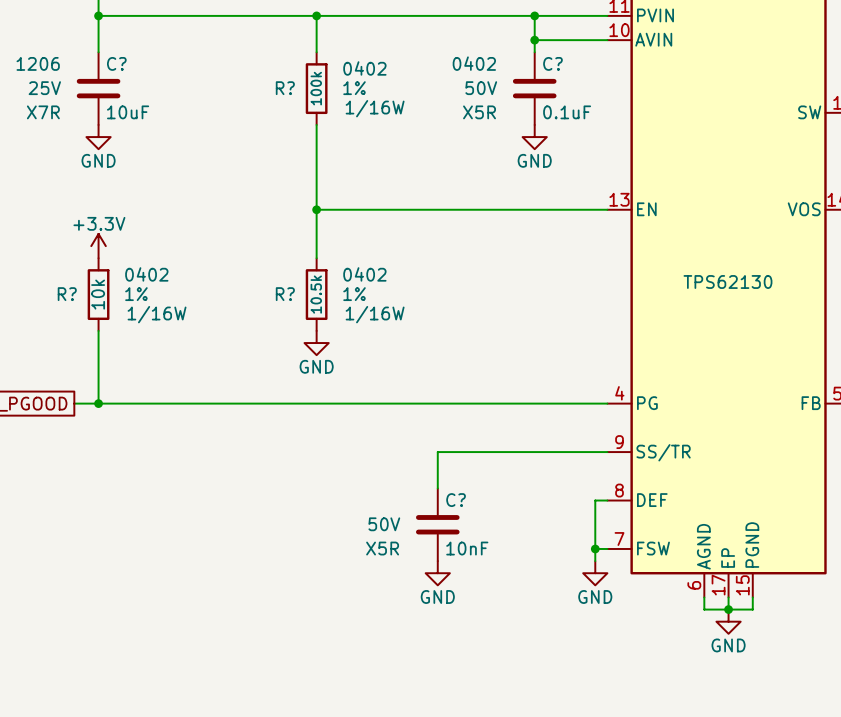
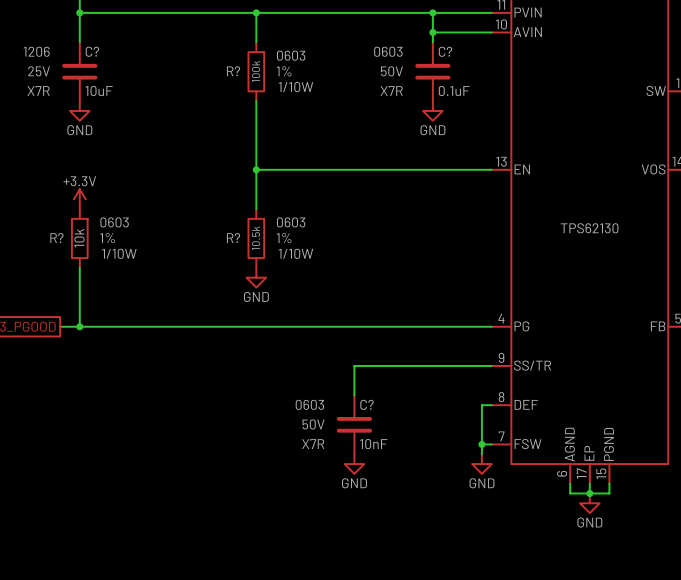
C? text: 0402 (474, 63) -> 0603 (388, 51)
R? text: 0402 (364, 68) -> 0603 (291, 55)
R? text: 1/16W (375, 108) -> 1/10W (295, 87)
C? text: X5R (479, 112) -> X7R (391, 90)
R? text: 0402 (146, 274) -> 0603 (114, 222)
R? text: 0402 (364, 274) -> 0603 (291, 222)
R? text: 1/16W (157, 314) -> 1/10W (119, 253)
R? text: 1/16W (375, 314) -> 1/10W (295, 253)
C? text: none -> 0603 (309, 404)
C? text: X5R (382, 548) -> X7R (313, 444)

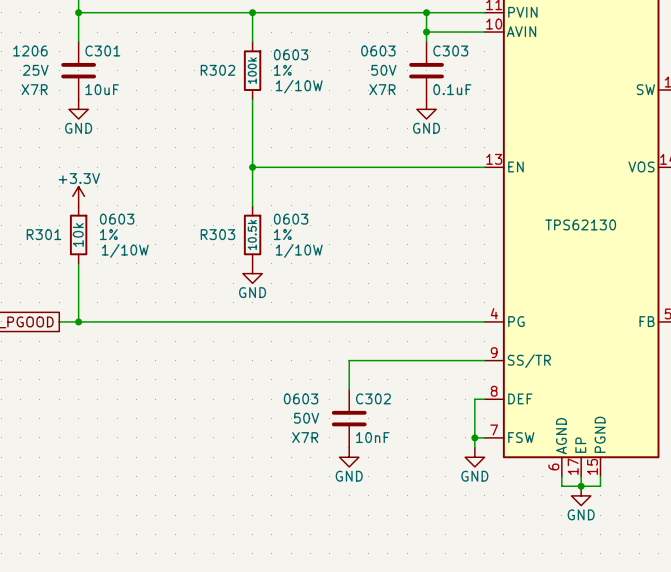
C? name: C? (92, 51) -> C301 (102, 50)
C? name: C? (445, 51) -> C303 (450, 50)
R? name: R? (233, 71) -> R302 (217, 70)
R? name: R? (56, 238) -> R301 (43, 234)
R? name: R? (233, 238) -> R303 (217, 234)
C? name: C? (367, 404) -> C302 (373, 398)

